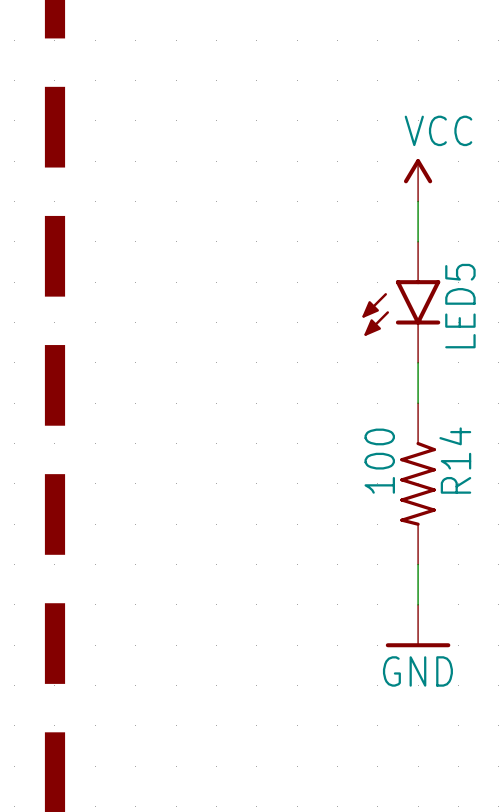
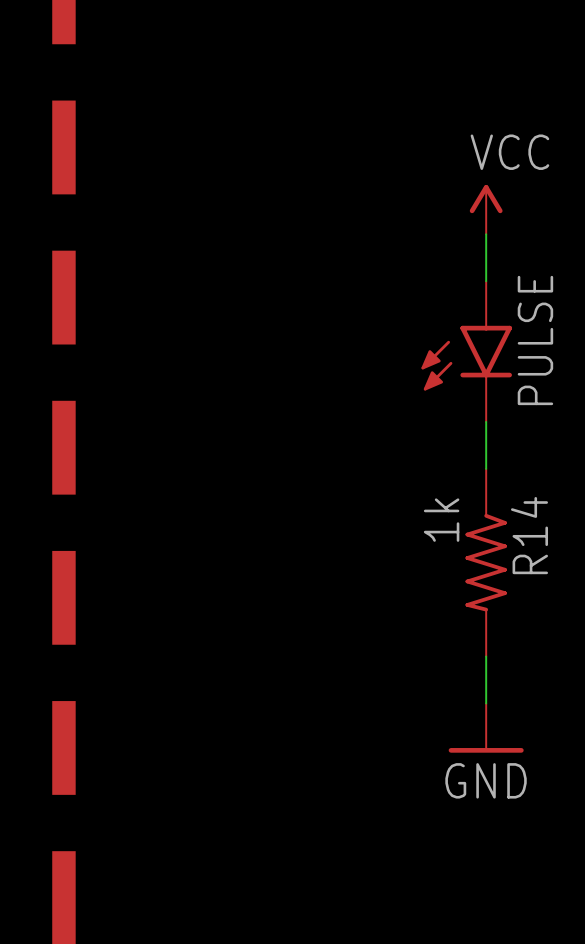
LED5 name: LED5 (460, 306) -> PULSE (535, 340)
R14 value: 100 (379, 461) -> 1k (441, 520)

